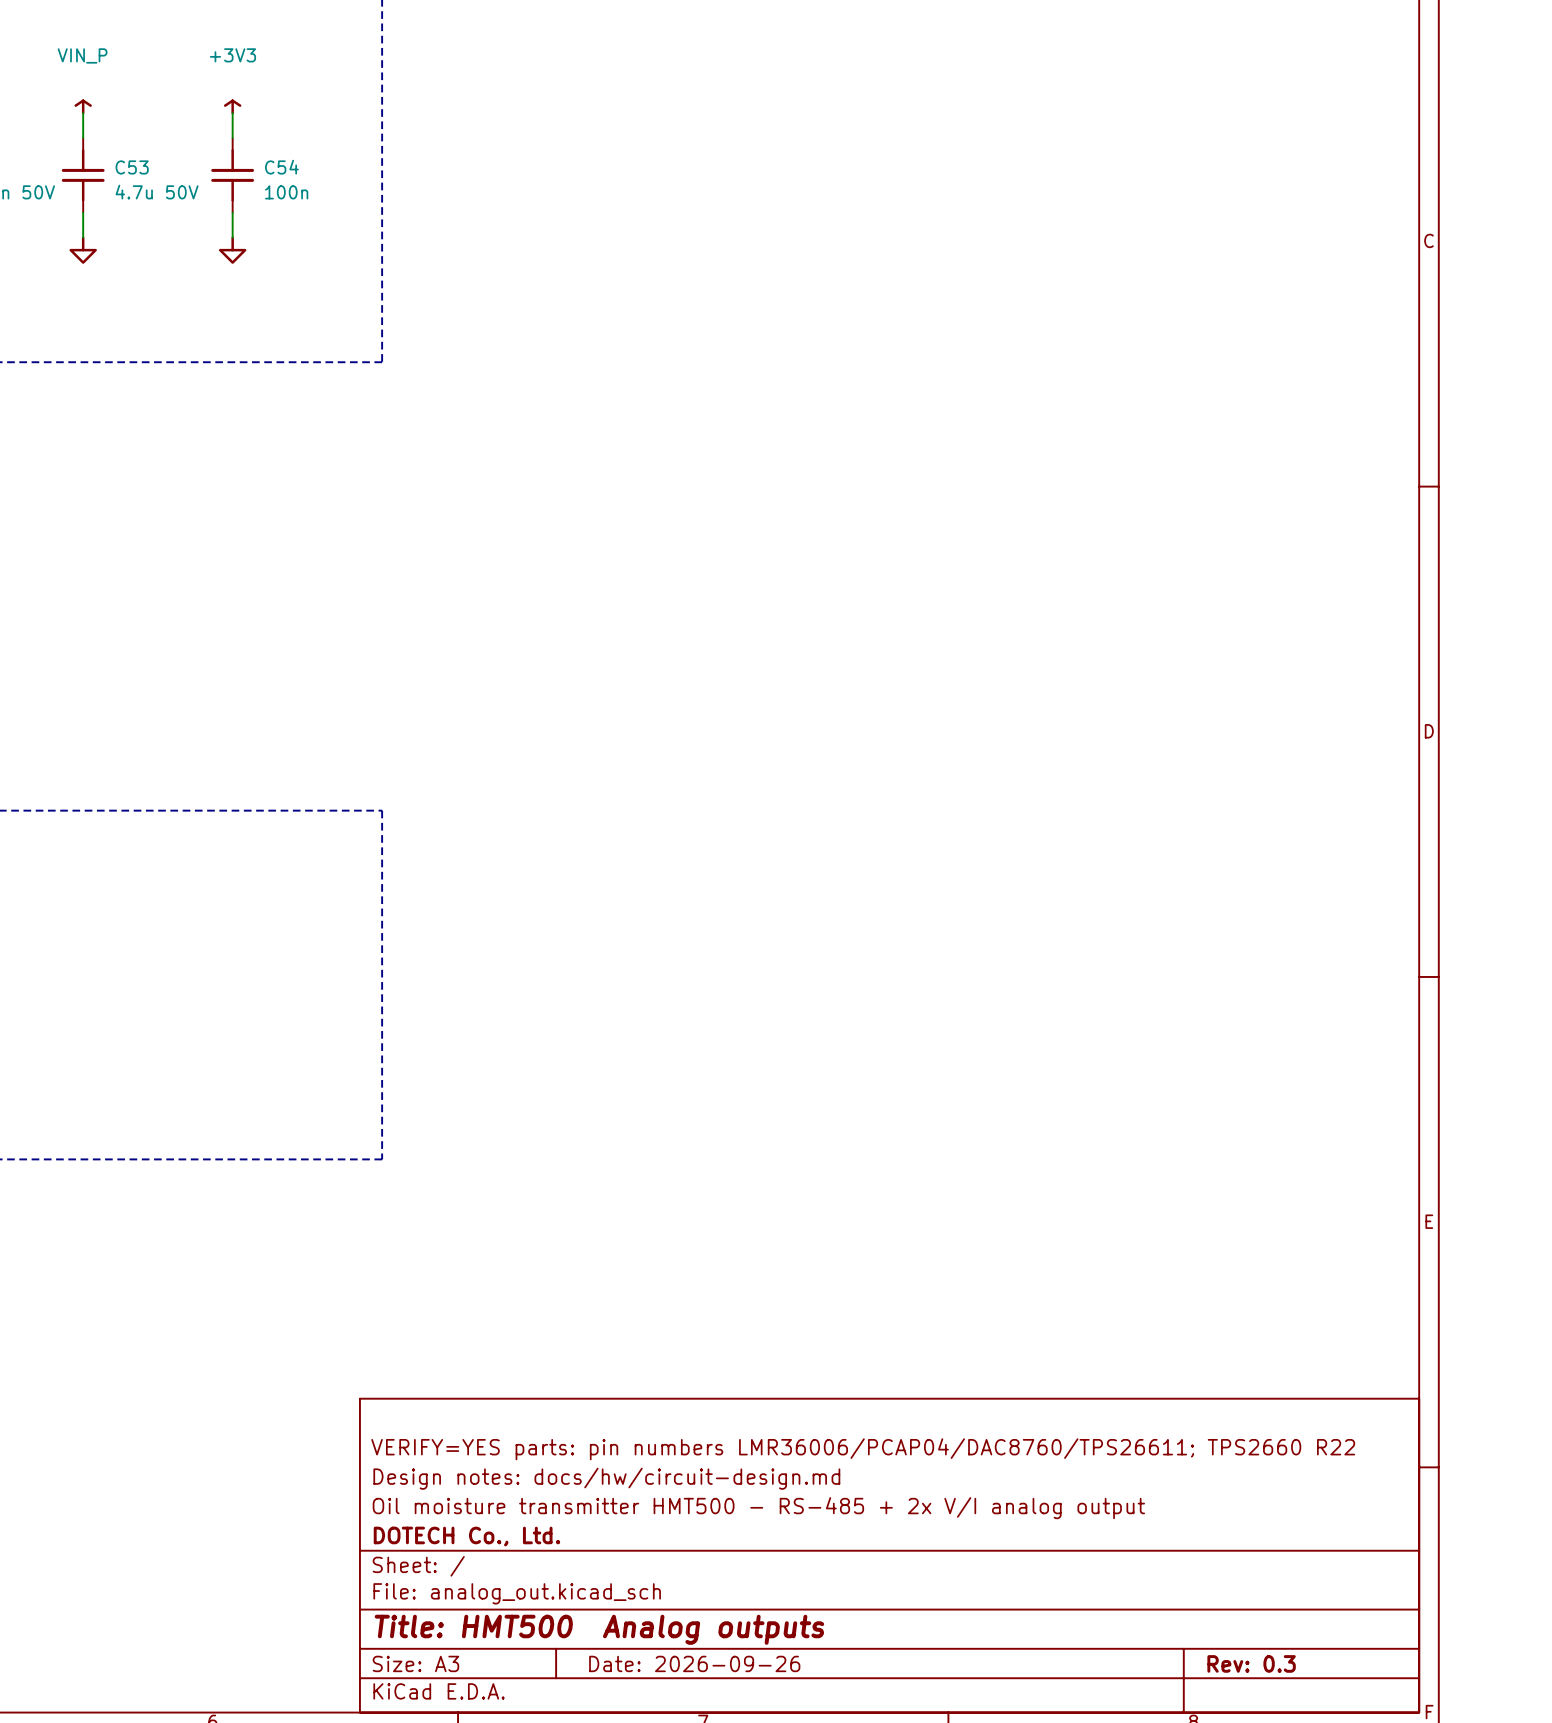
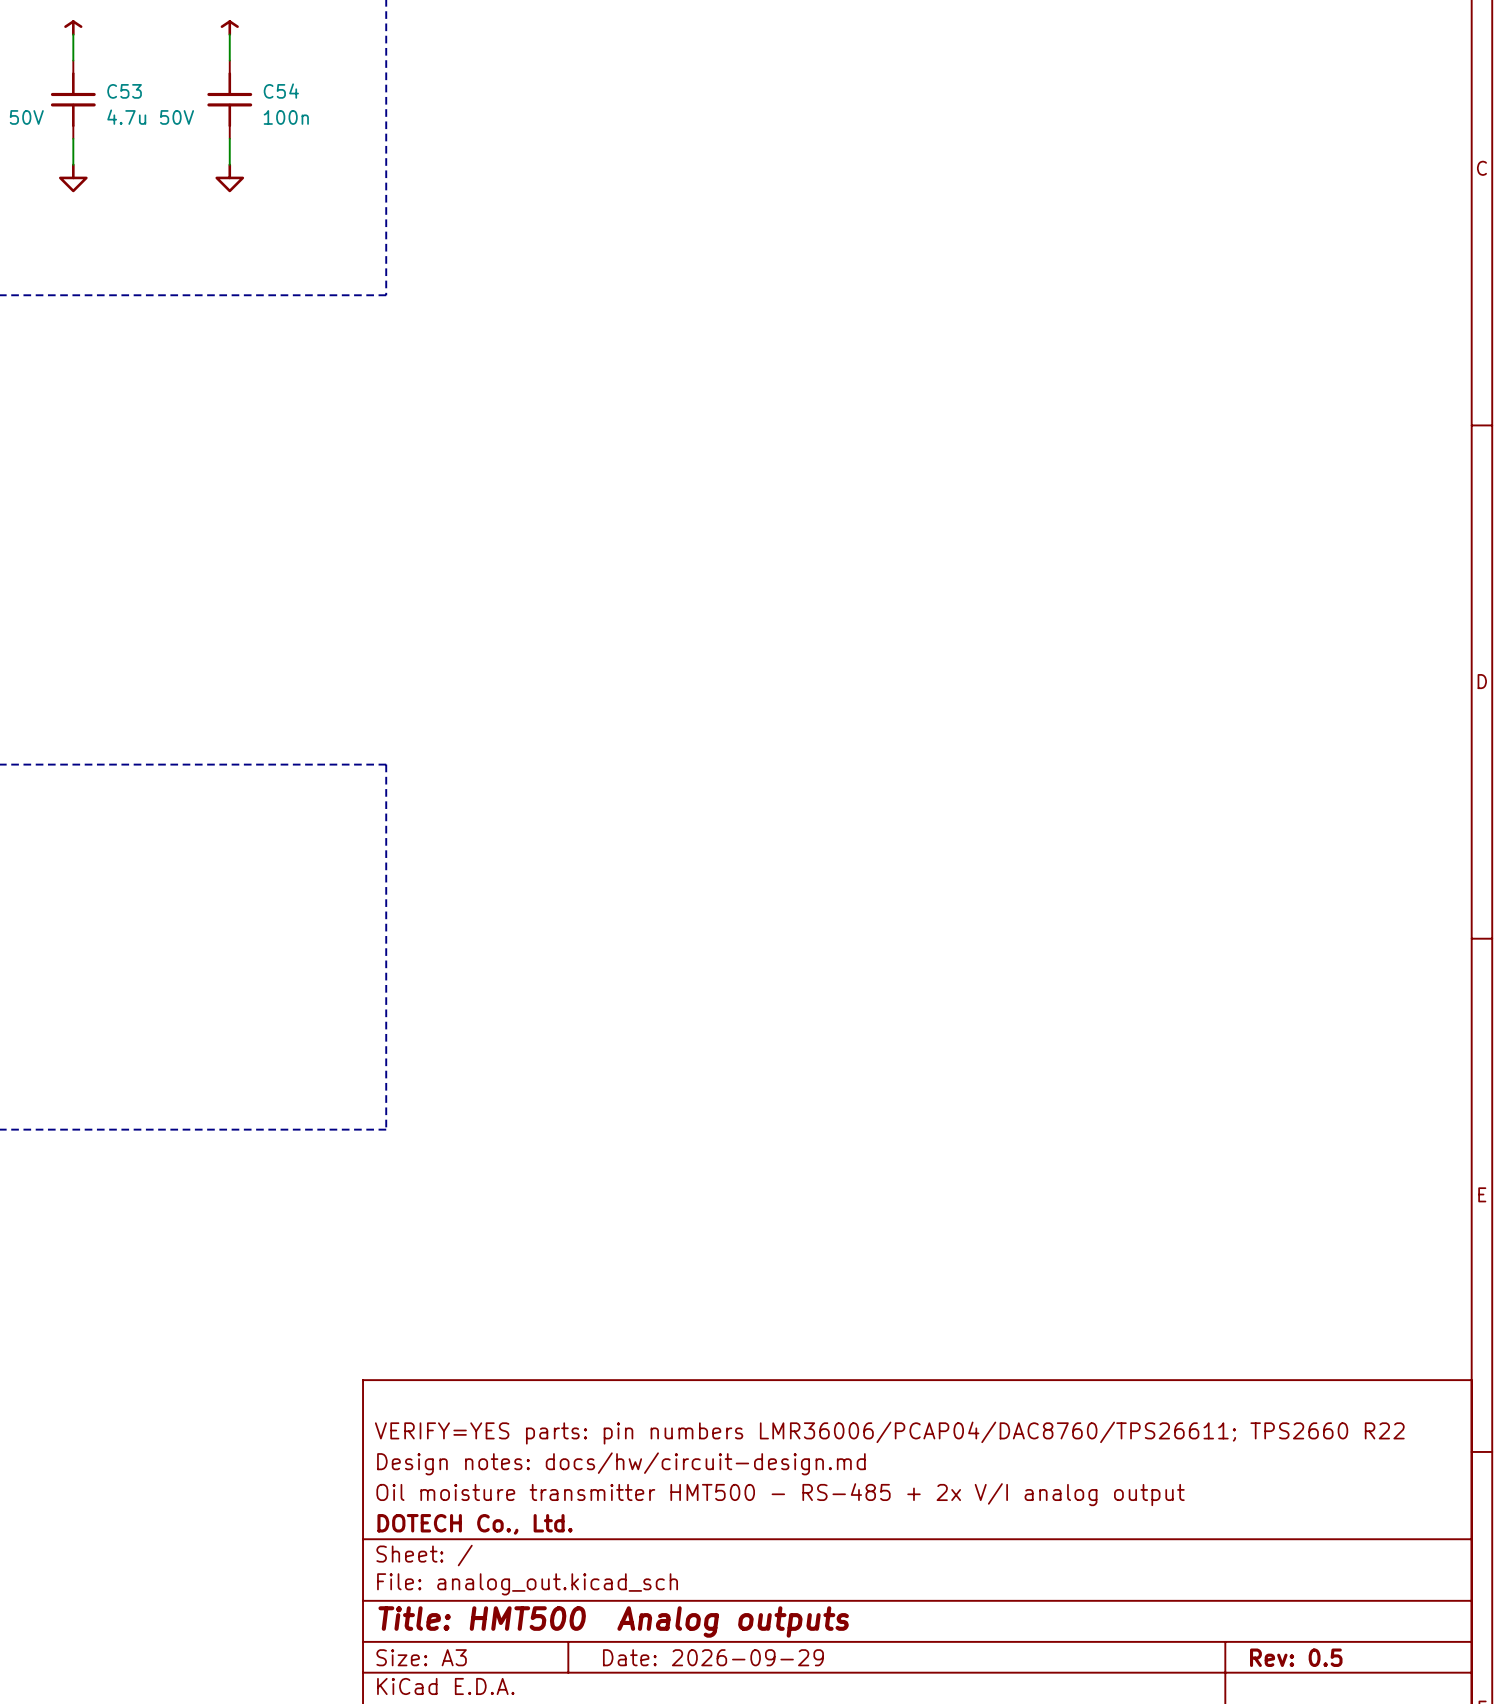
title block: Date: 2026-09-26 (694, 1663) -> Date: 2026-09-29 (713, 1657)
title block: Rev: 0.3 (1251, 1663) -> Rev: 0.5 (1296, 1657)

